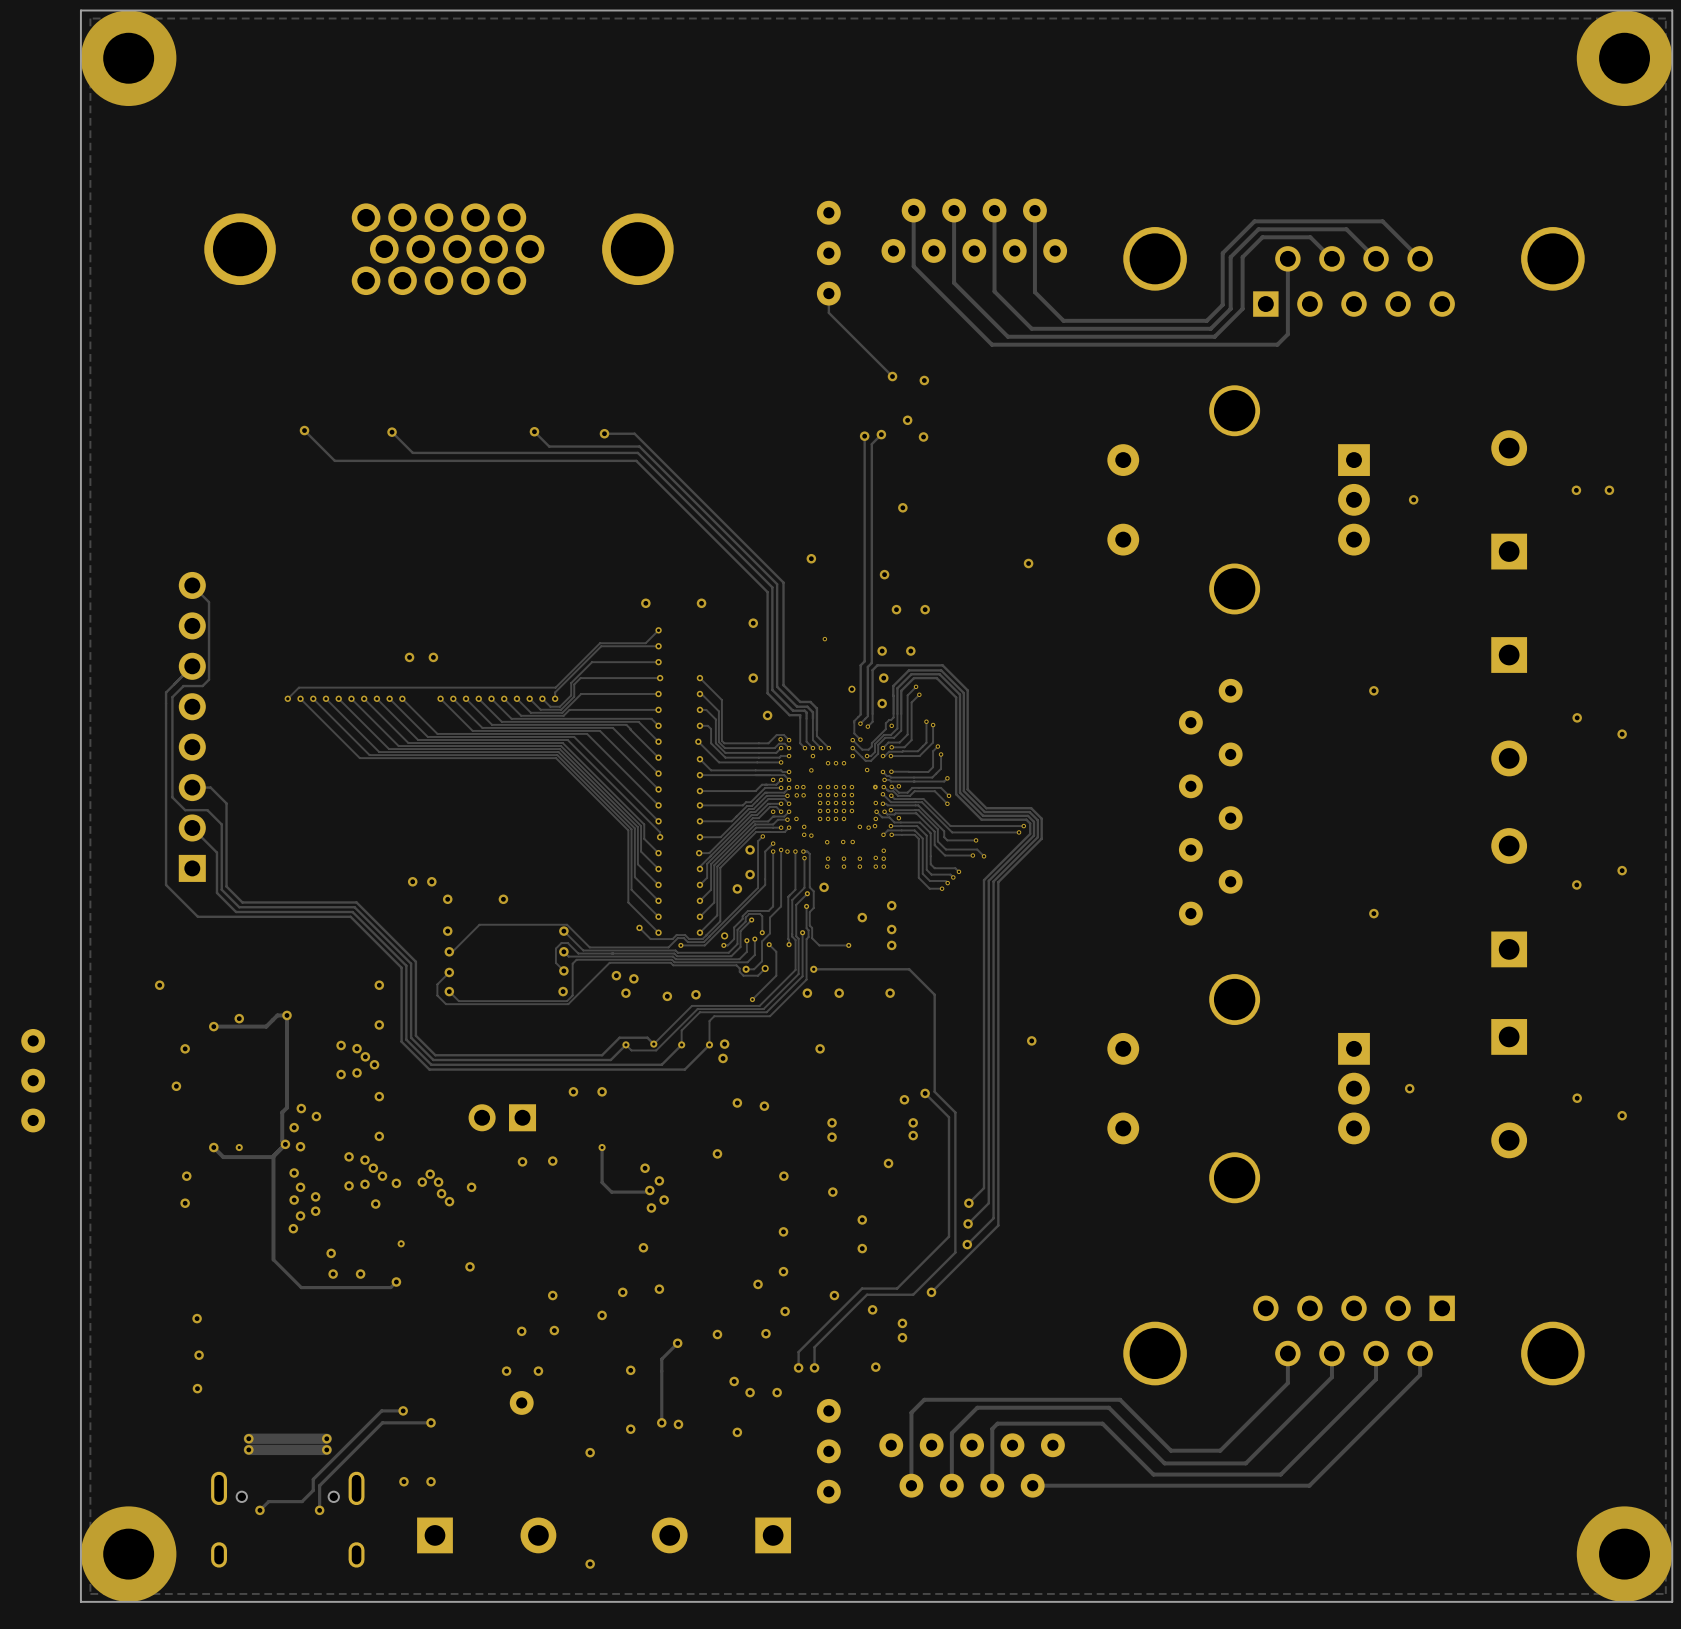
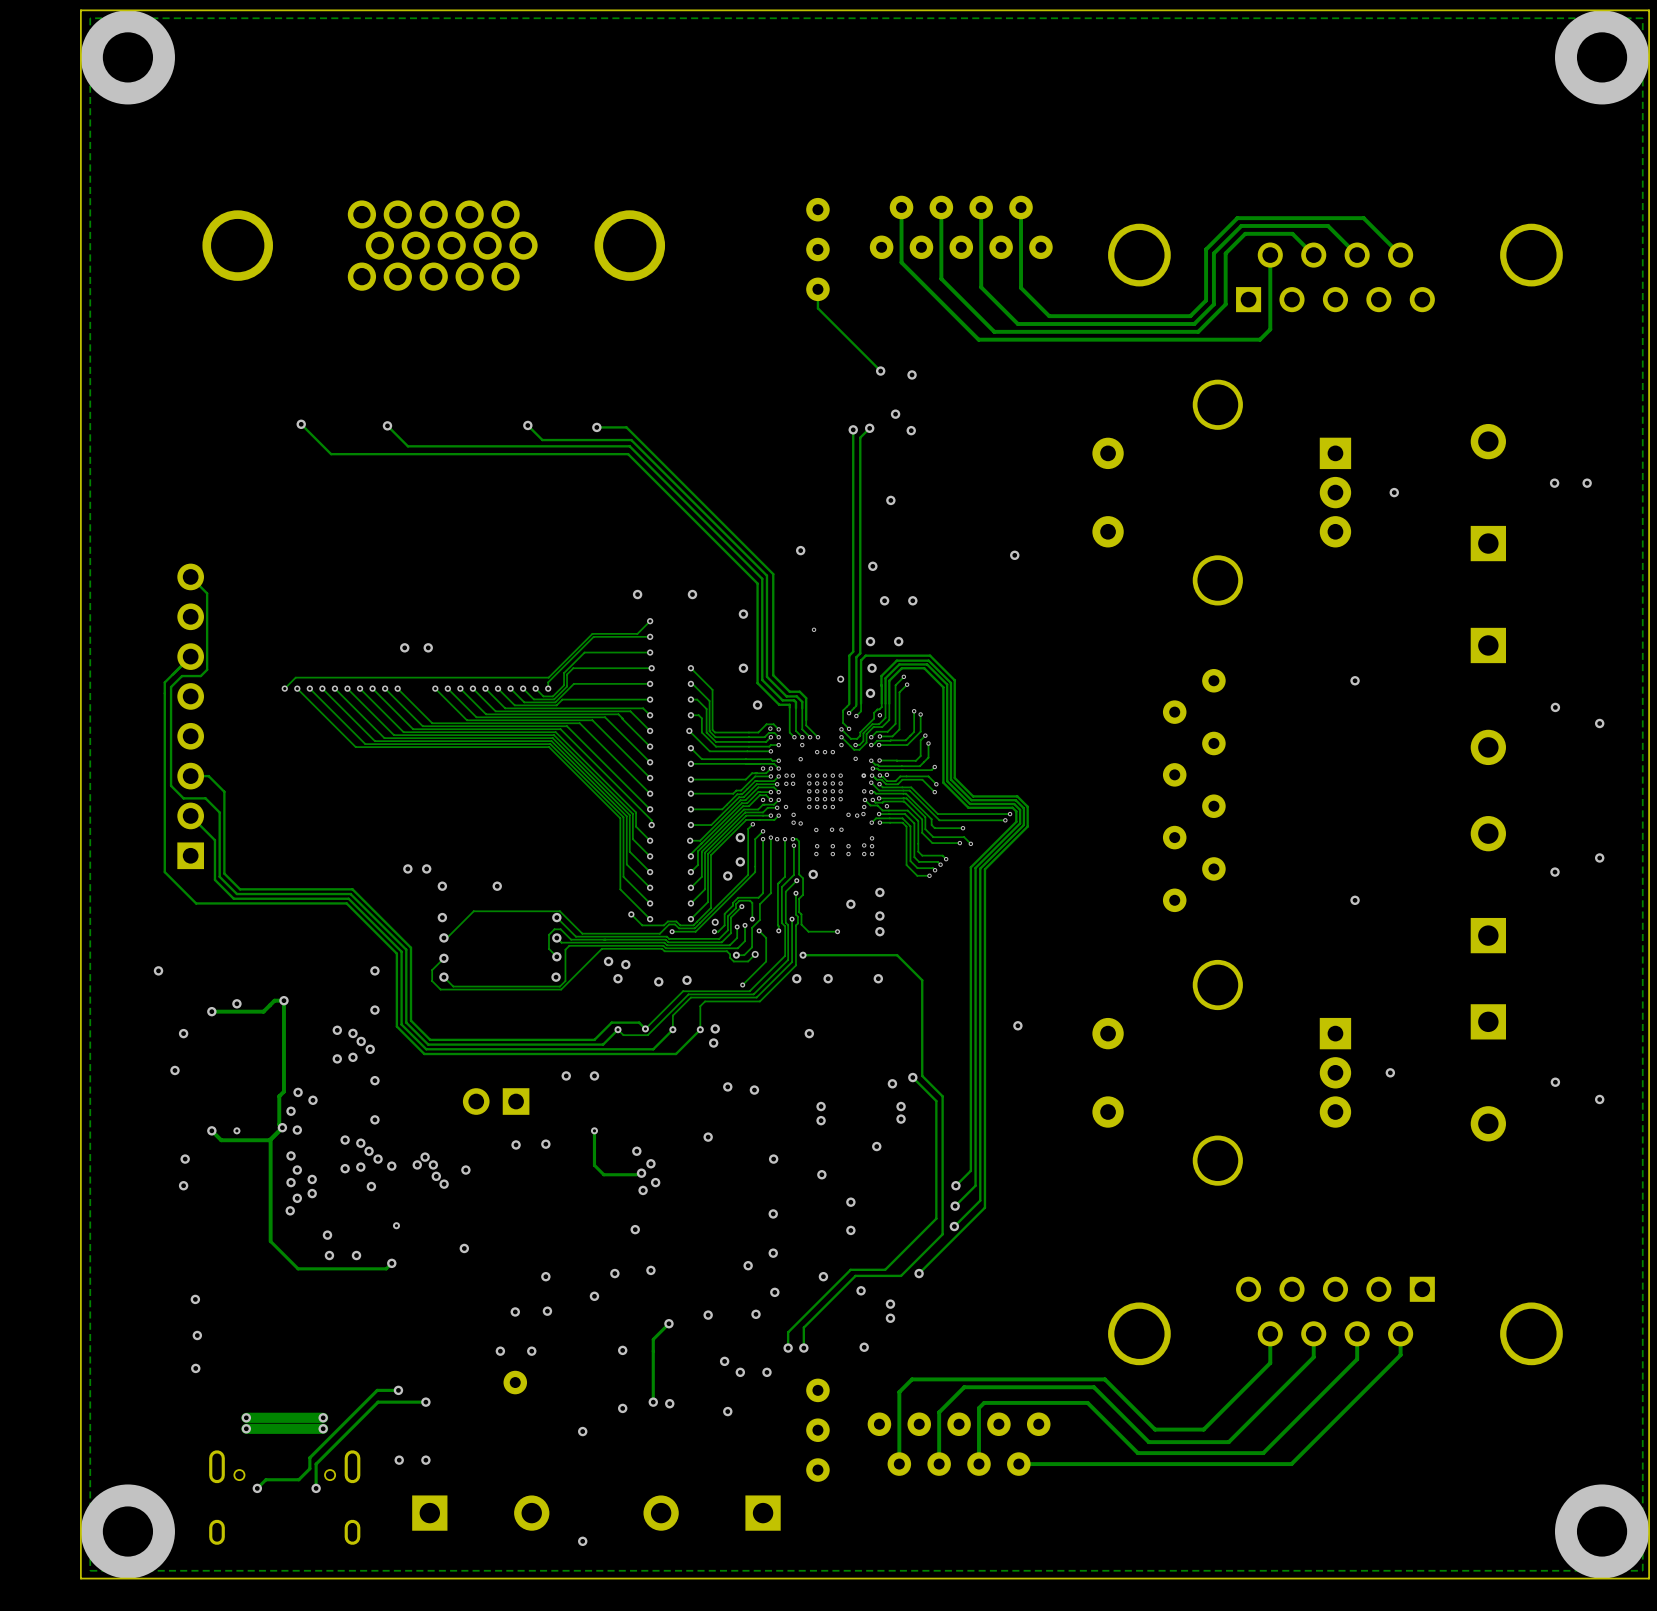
part: (33, 1040) -> none
part: (33, 1080) -> none
part: (33, 1120) -> none

